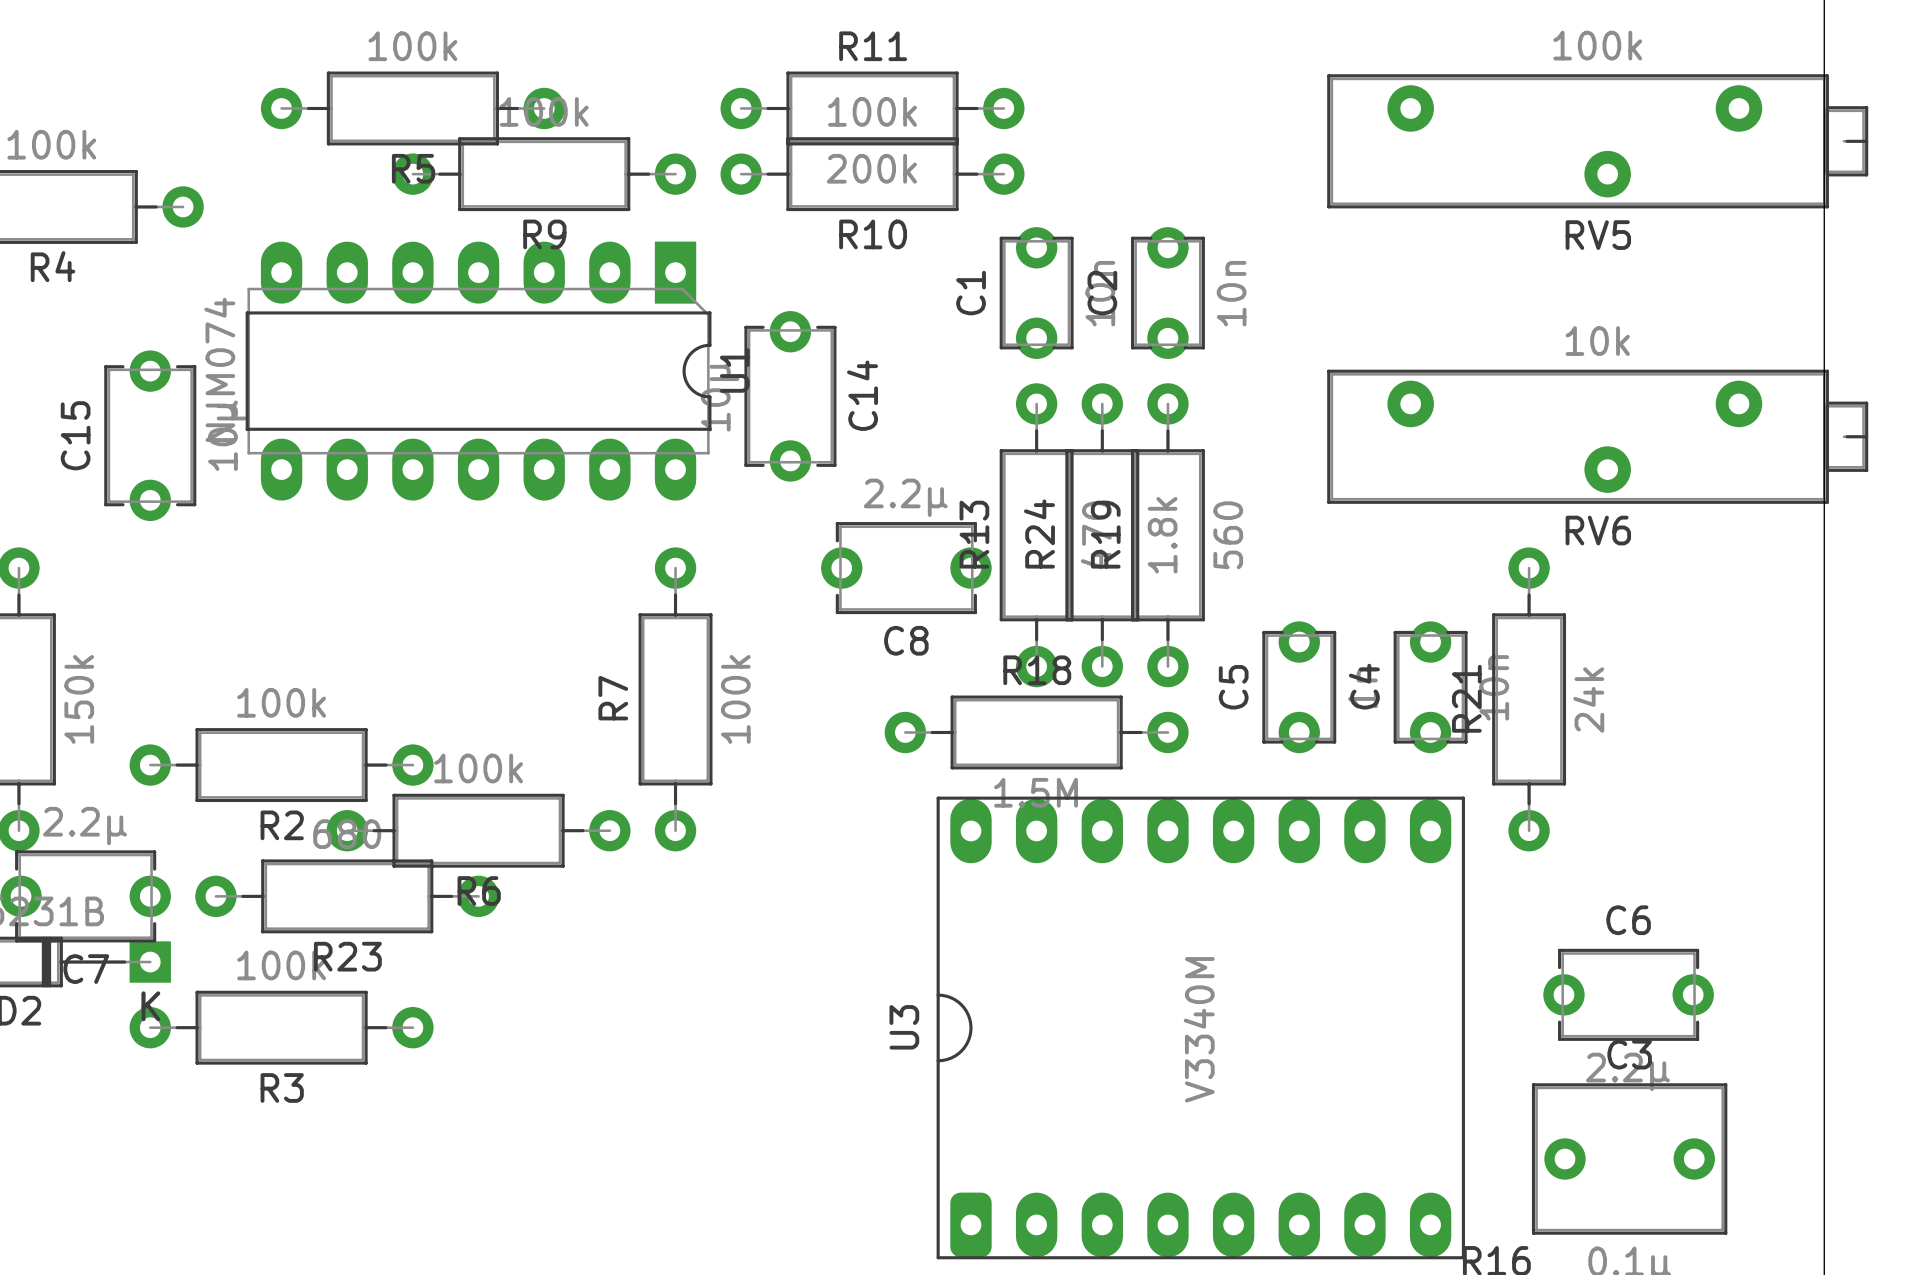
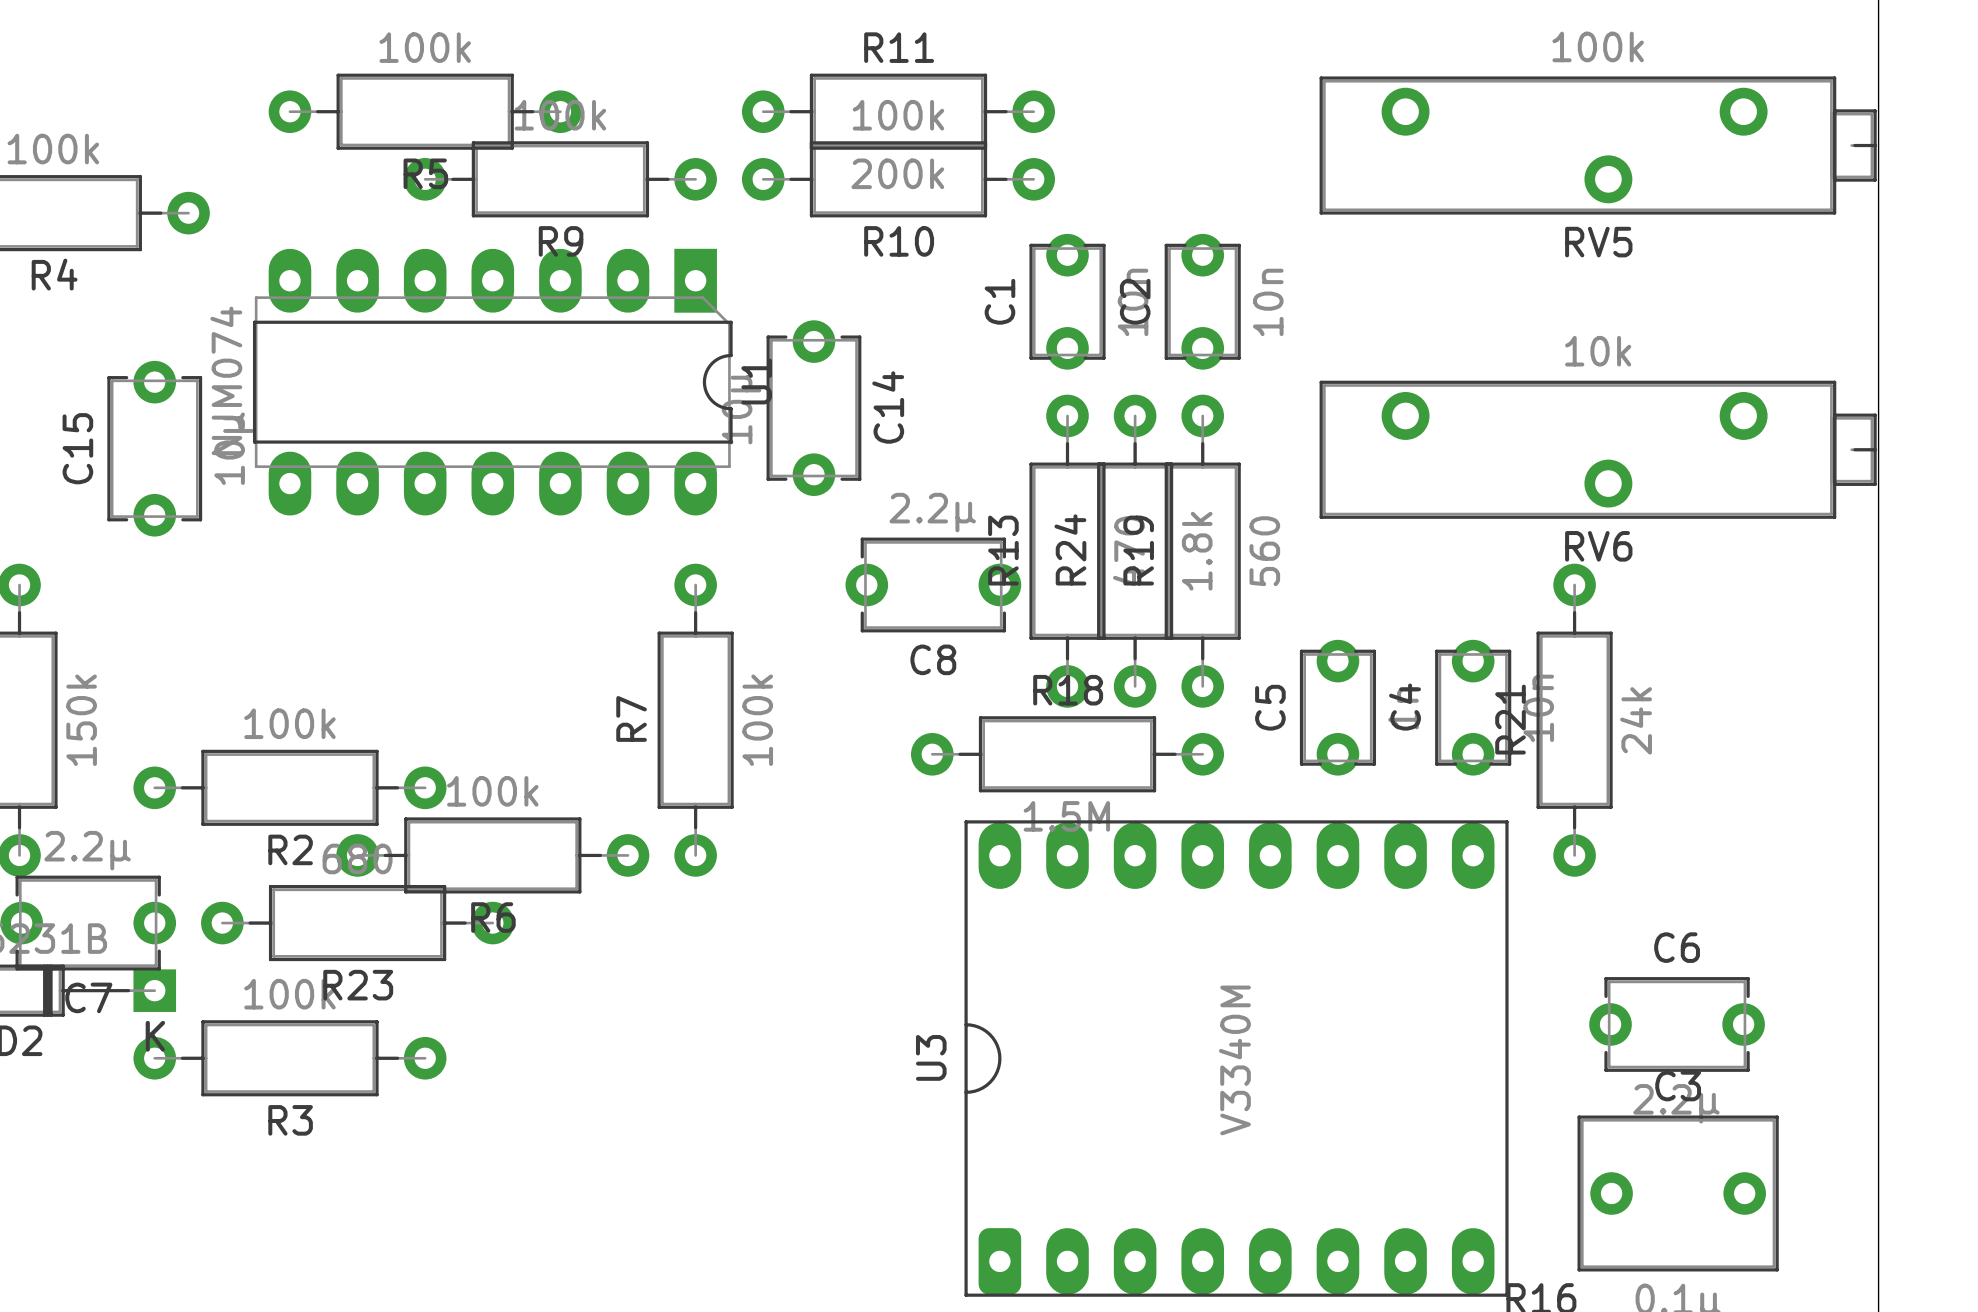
RV5 footprint: [1327, 74, 1869, 209] -> [1319, 76, 1877, 215]
RV6 footprint: [1327, 369, 1869, 504] -> [1319, 380, 1877, 519]

